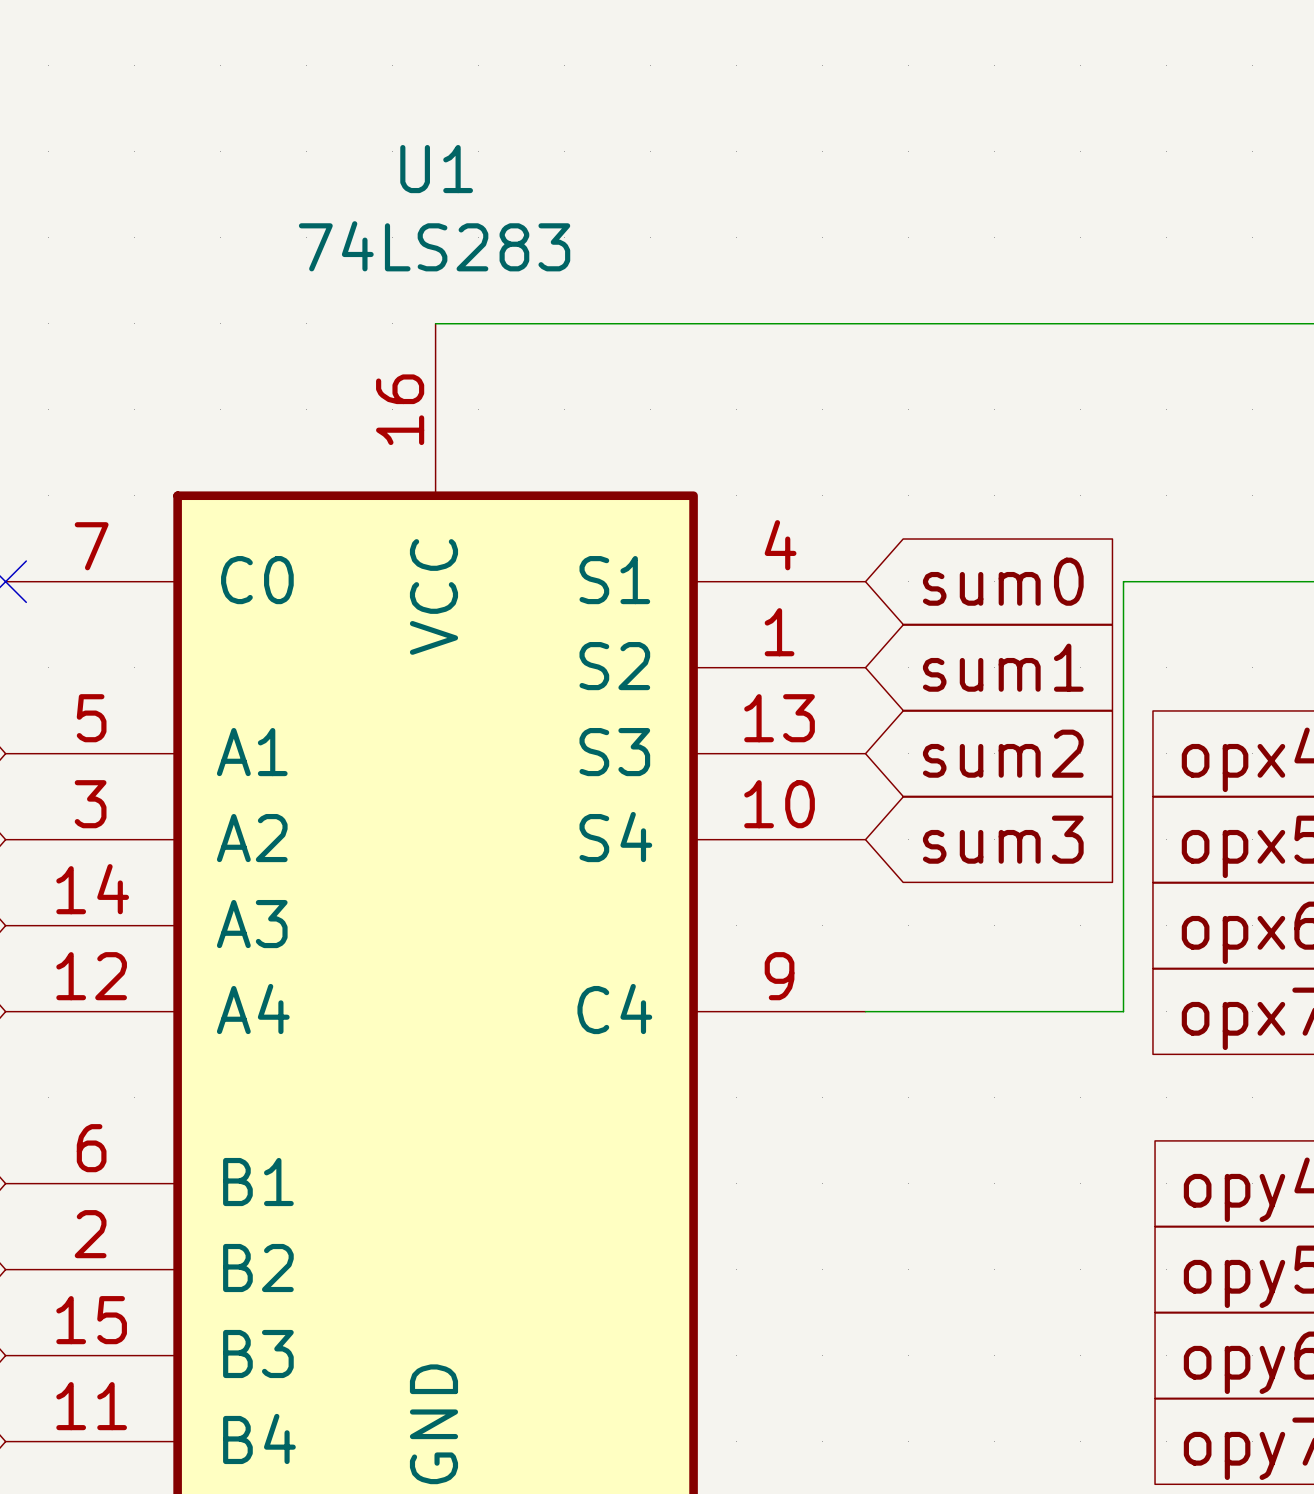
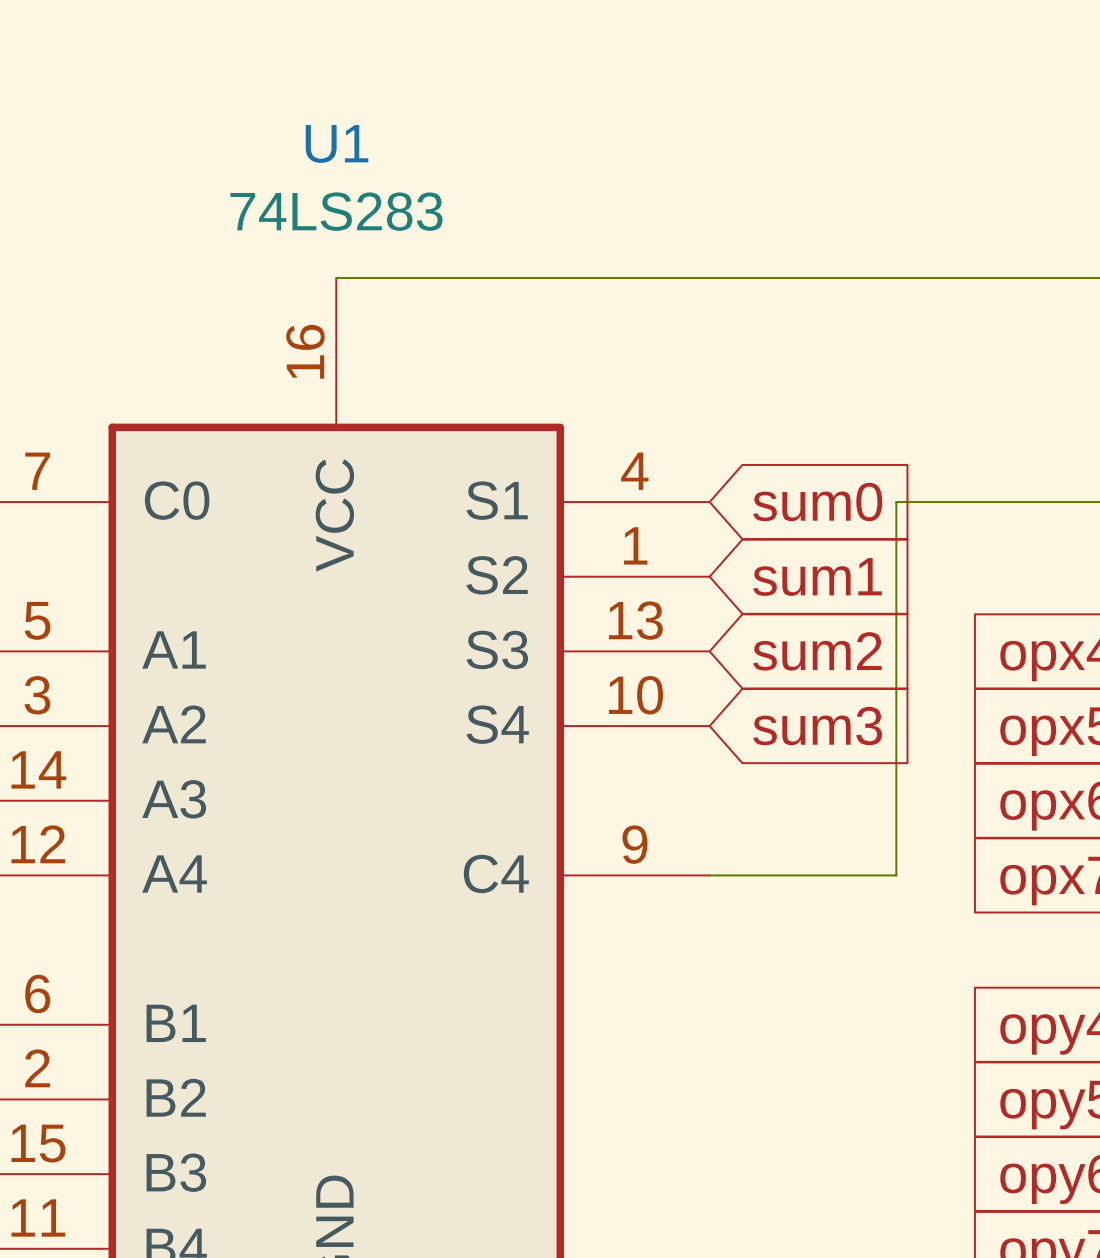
wire: (1123, 581) (1123, 1011) (1080, 1011) -> (933, 502) (896, 502) (896, 875)

